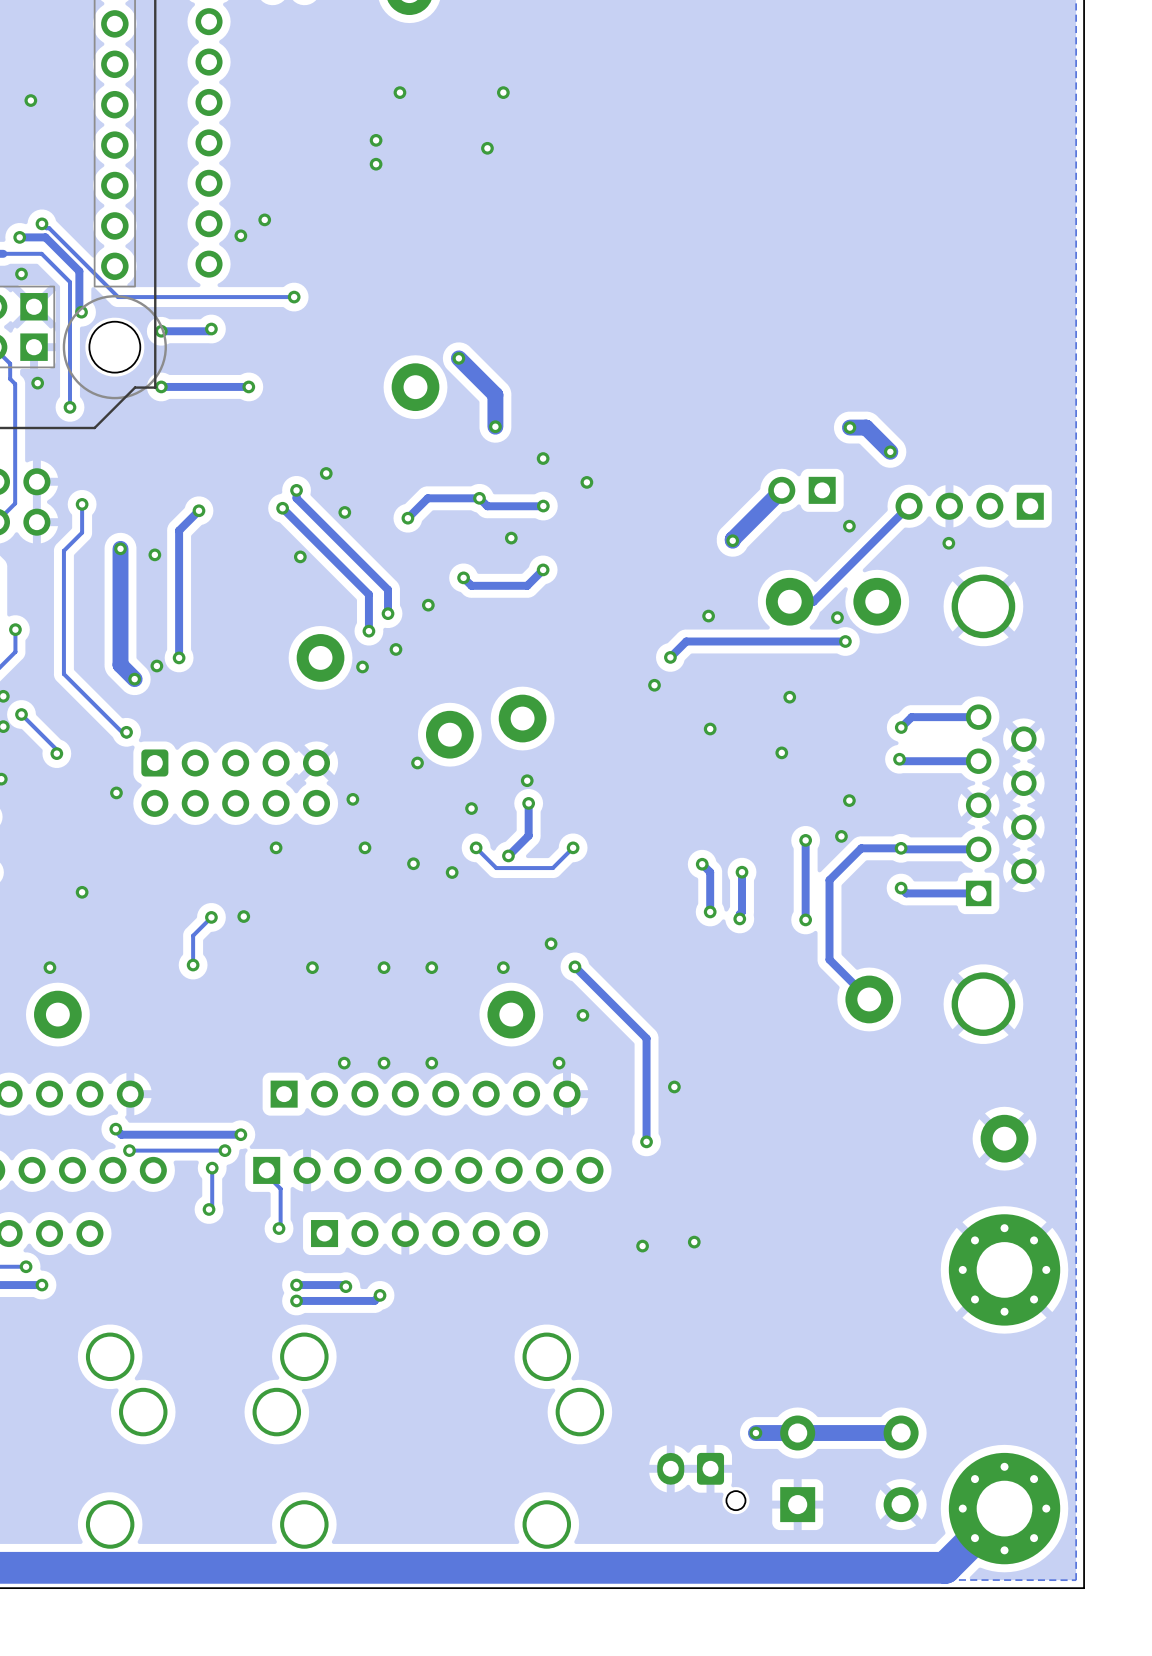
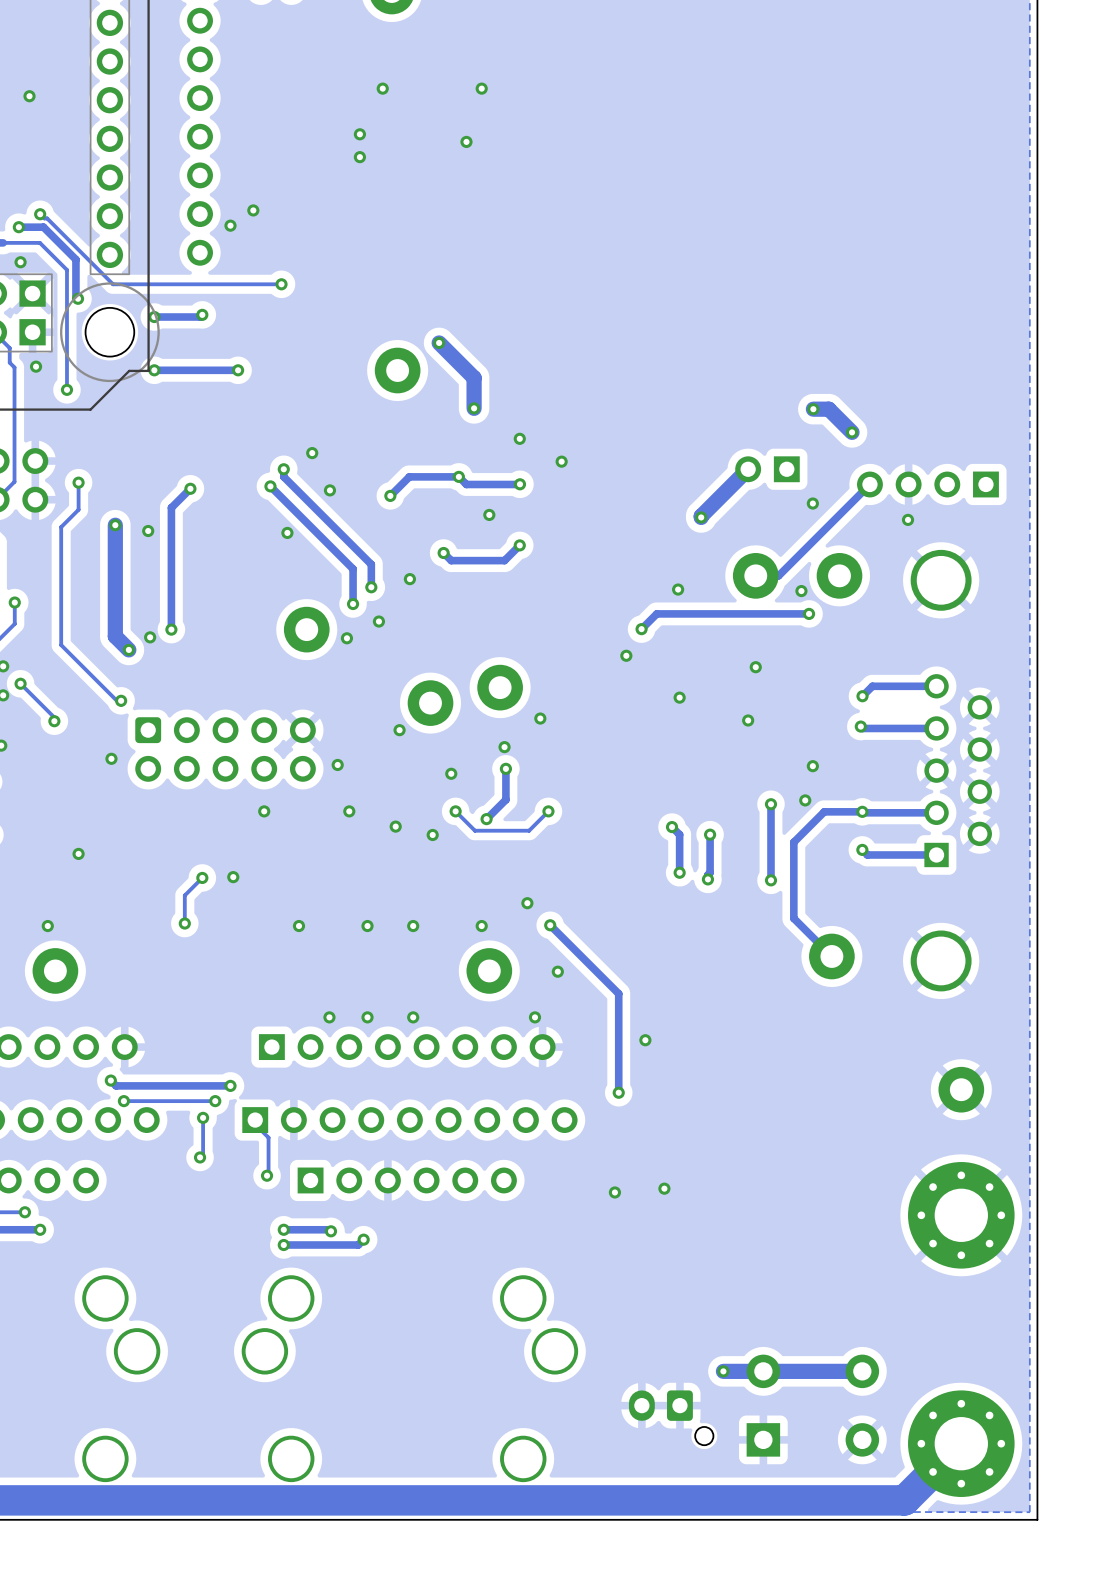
via: none -> (540, 718)

